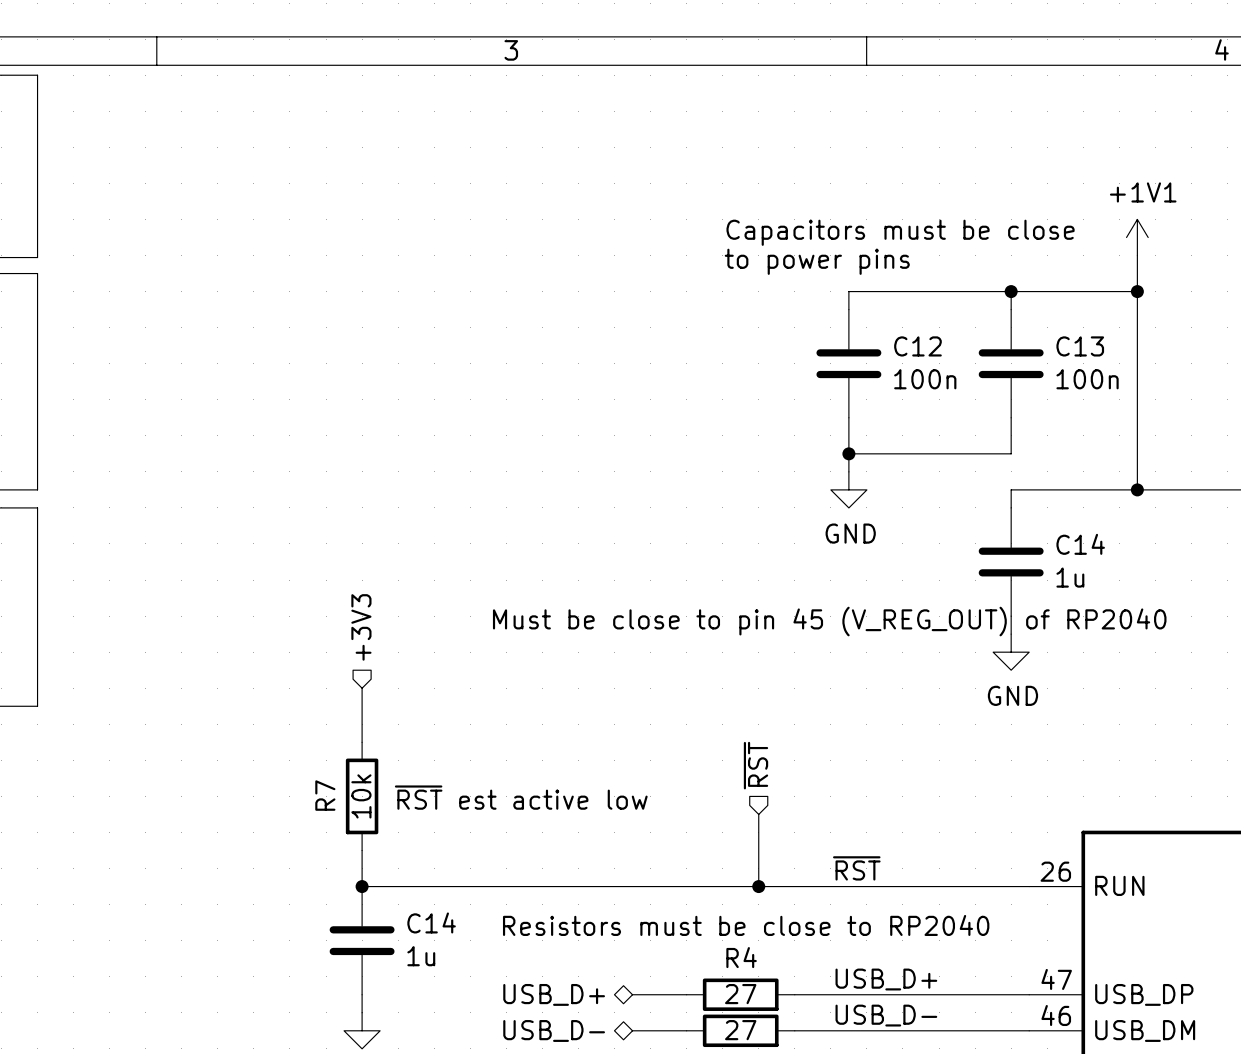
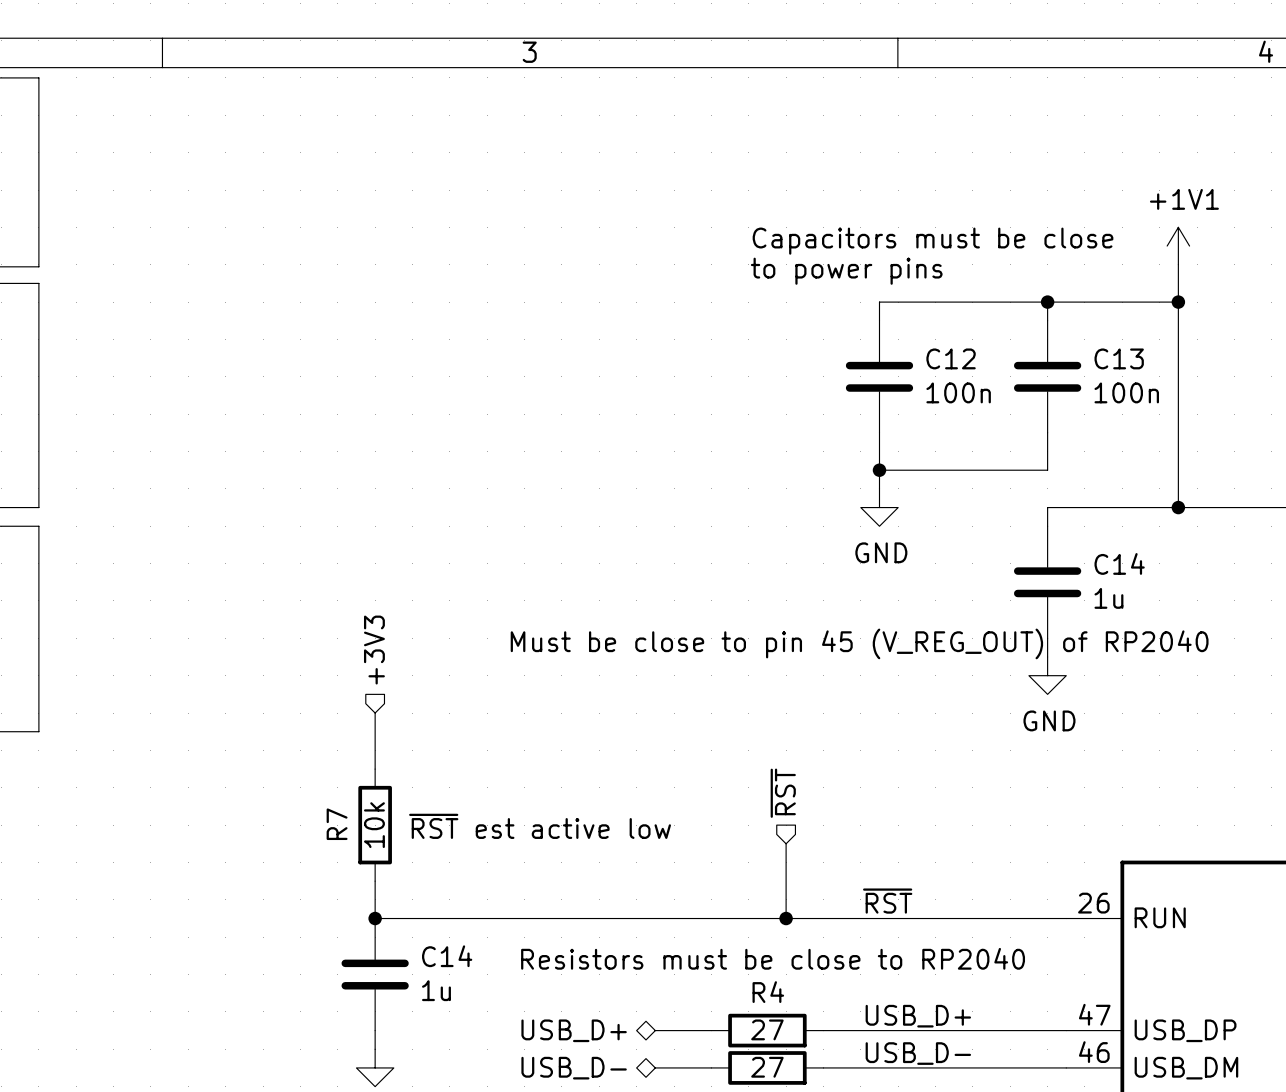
label: ~{RST} (856, 868) -> none
text: none -> ~{RST} (887, 901)
label: USB_D+ (886, 979) -> none
text: none -> USB_D+ (918, 1016)
label: USB_D- (886, 1015) -> none
text: none -> USB_D- (918, 1053)

